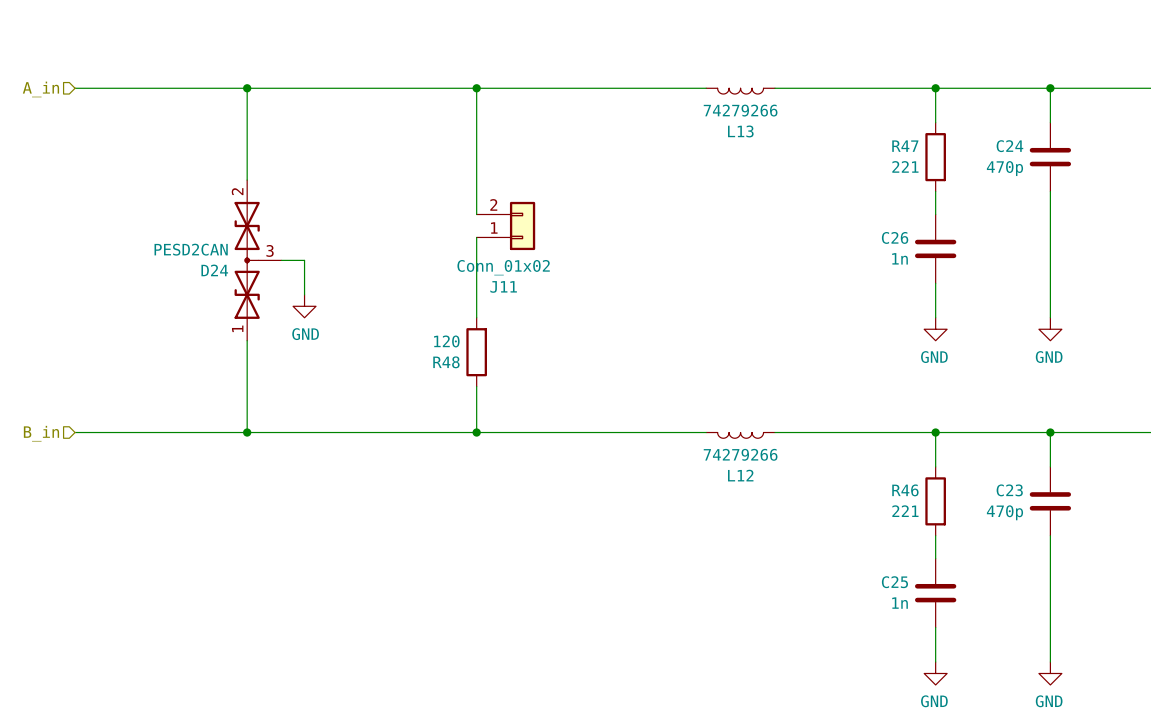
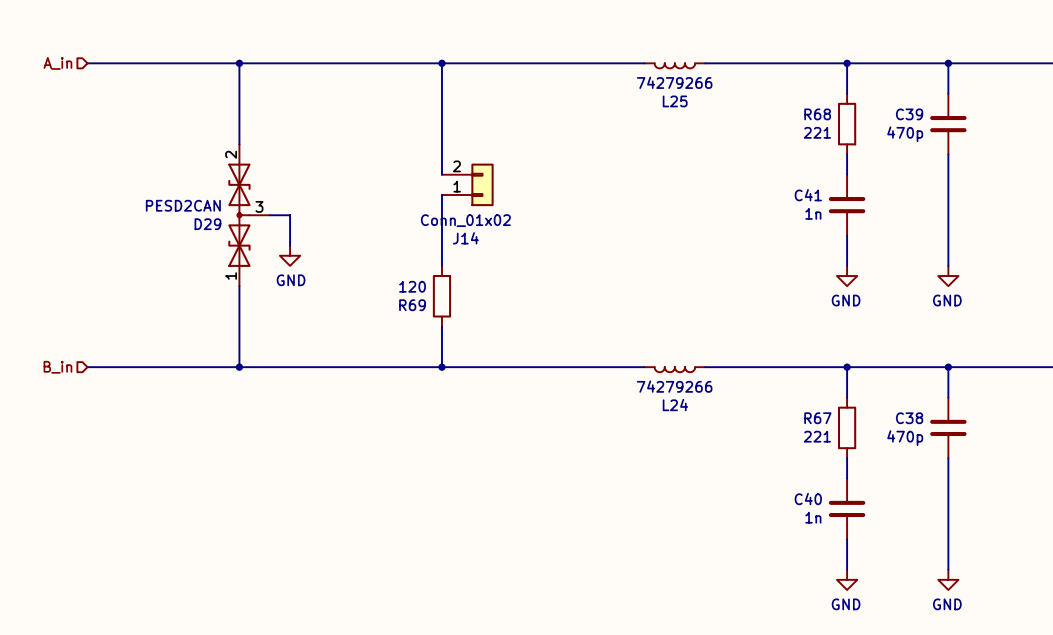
L13 name: L13 (740, 131) -> L25 (675, 101)
R47 name: R47 (905, 146) -> R68 (817, 114)
C24 name: C24 (1009, 146) -> C39 (909, 114)
C26 name: C26 (895, 237) -> C41 (808, 195)
D24 name: D24 (214, 270) -> D29 (207, 224)
J11 name: J11 (503, 286) -> J14 (465, 238)
R48 name: R48 (446, 362) -> R69 (412, 305)
L12 name: L12 (740, 475) -> L24 (675, 405)
R46 name: R46 (905, 490) -> R67 (817, 418)
C23 name: C23 (1009, 490) -> C38 (909, 418)
C25 name: C25 (894, 582) -> C40 (808, 499)

